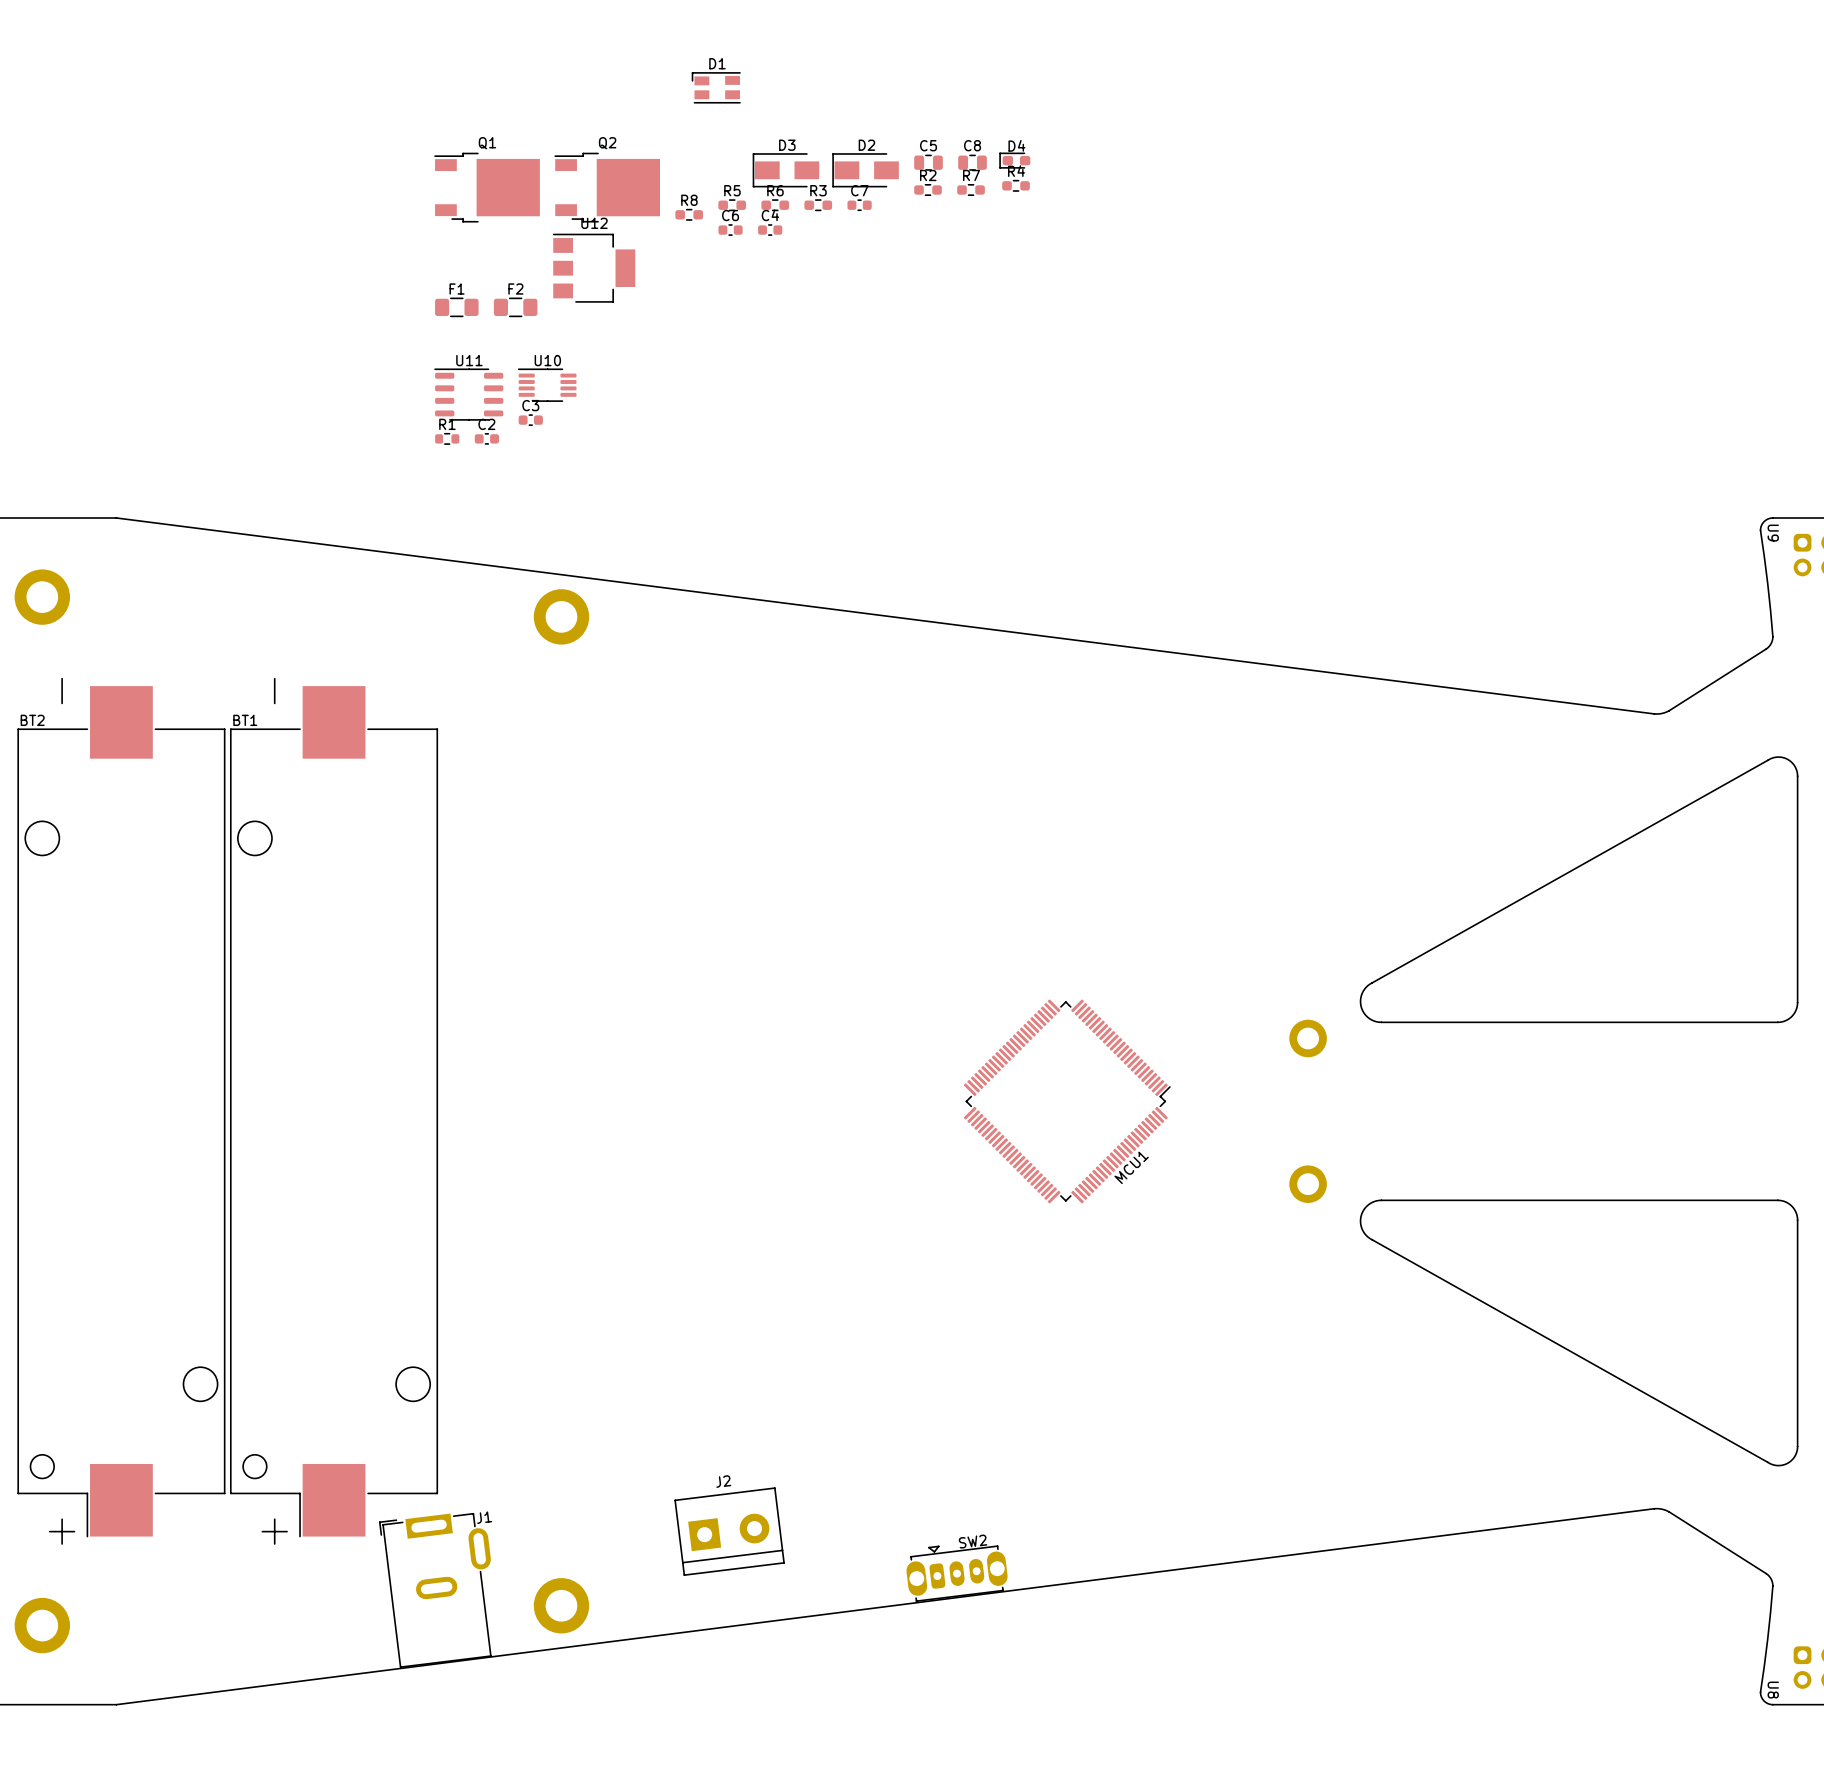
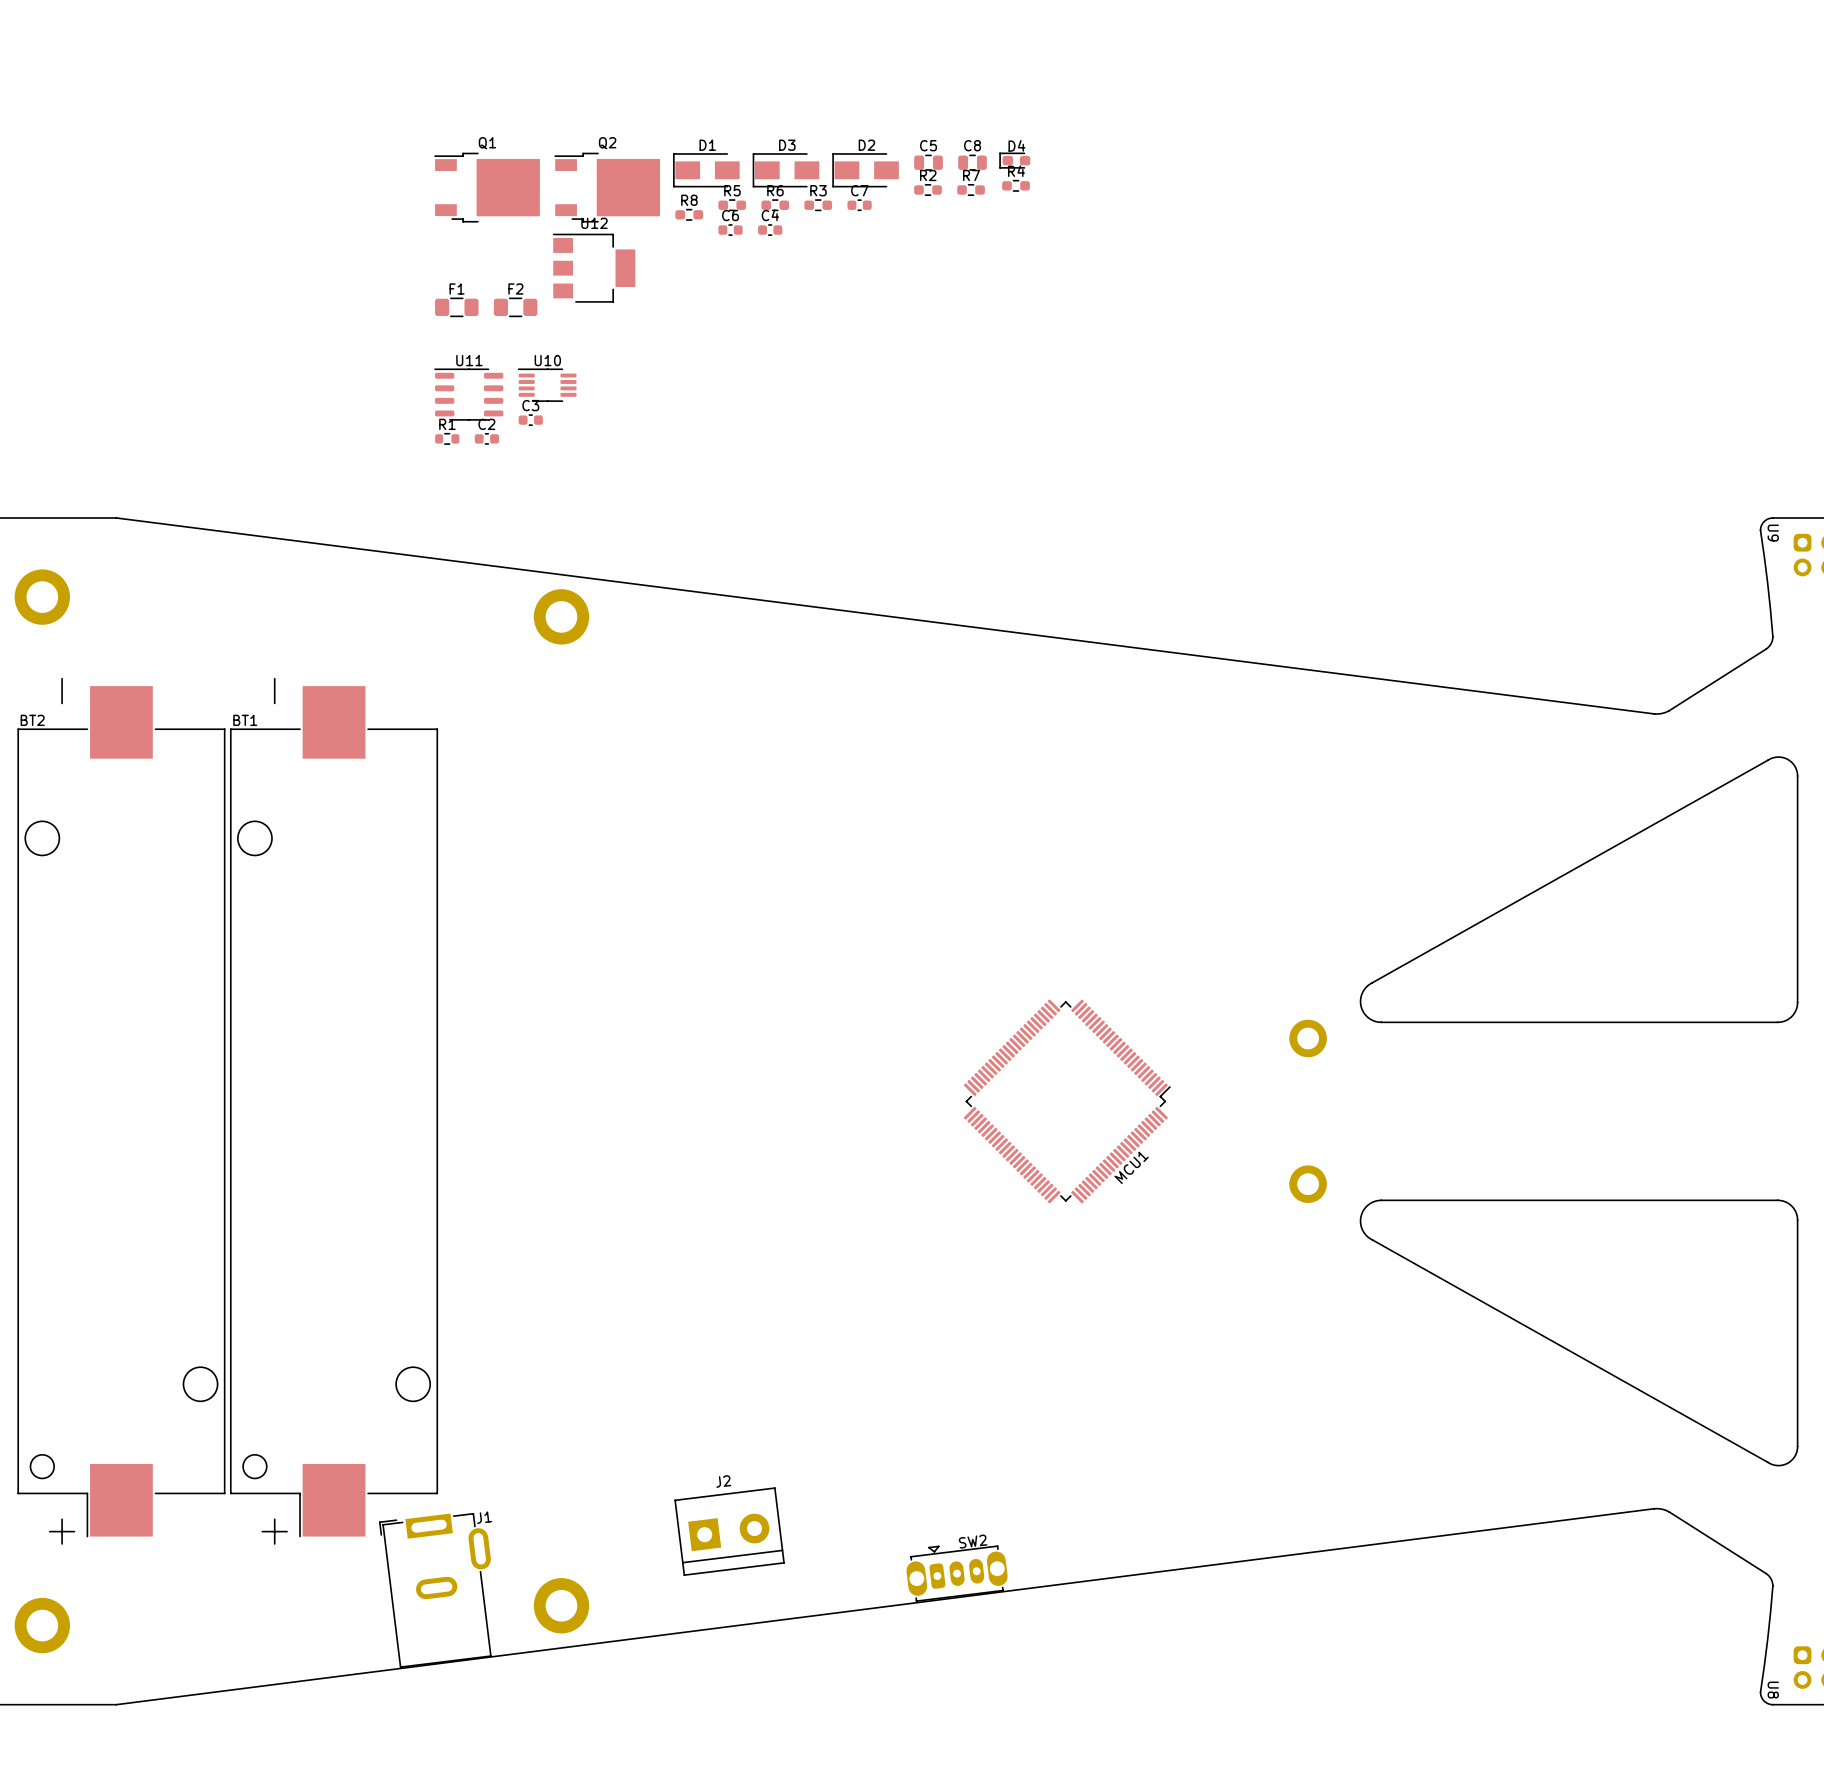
D1 footprint: [691, 72, 741, 104] -> [673, 153, 740, 188]

